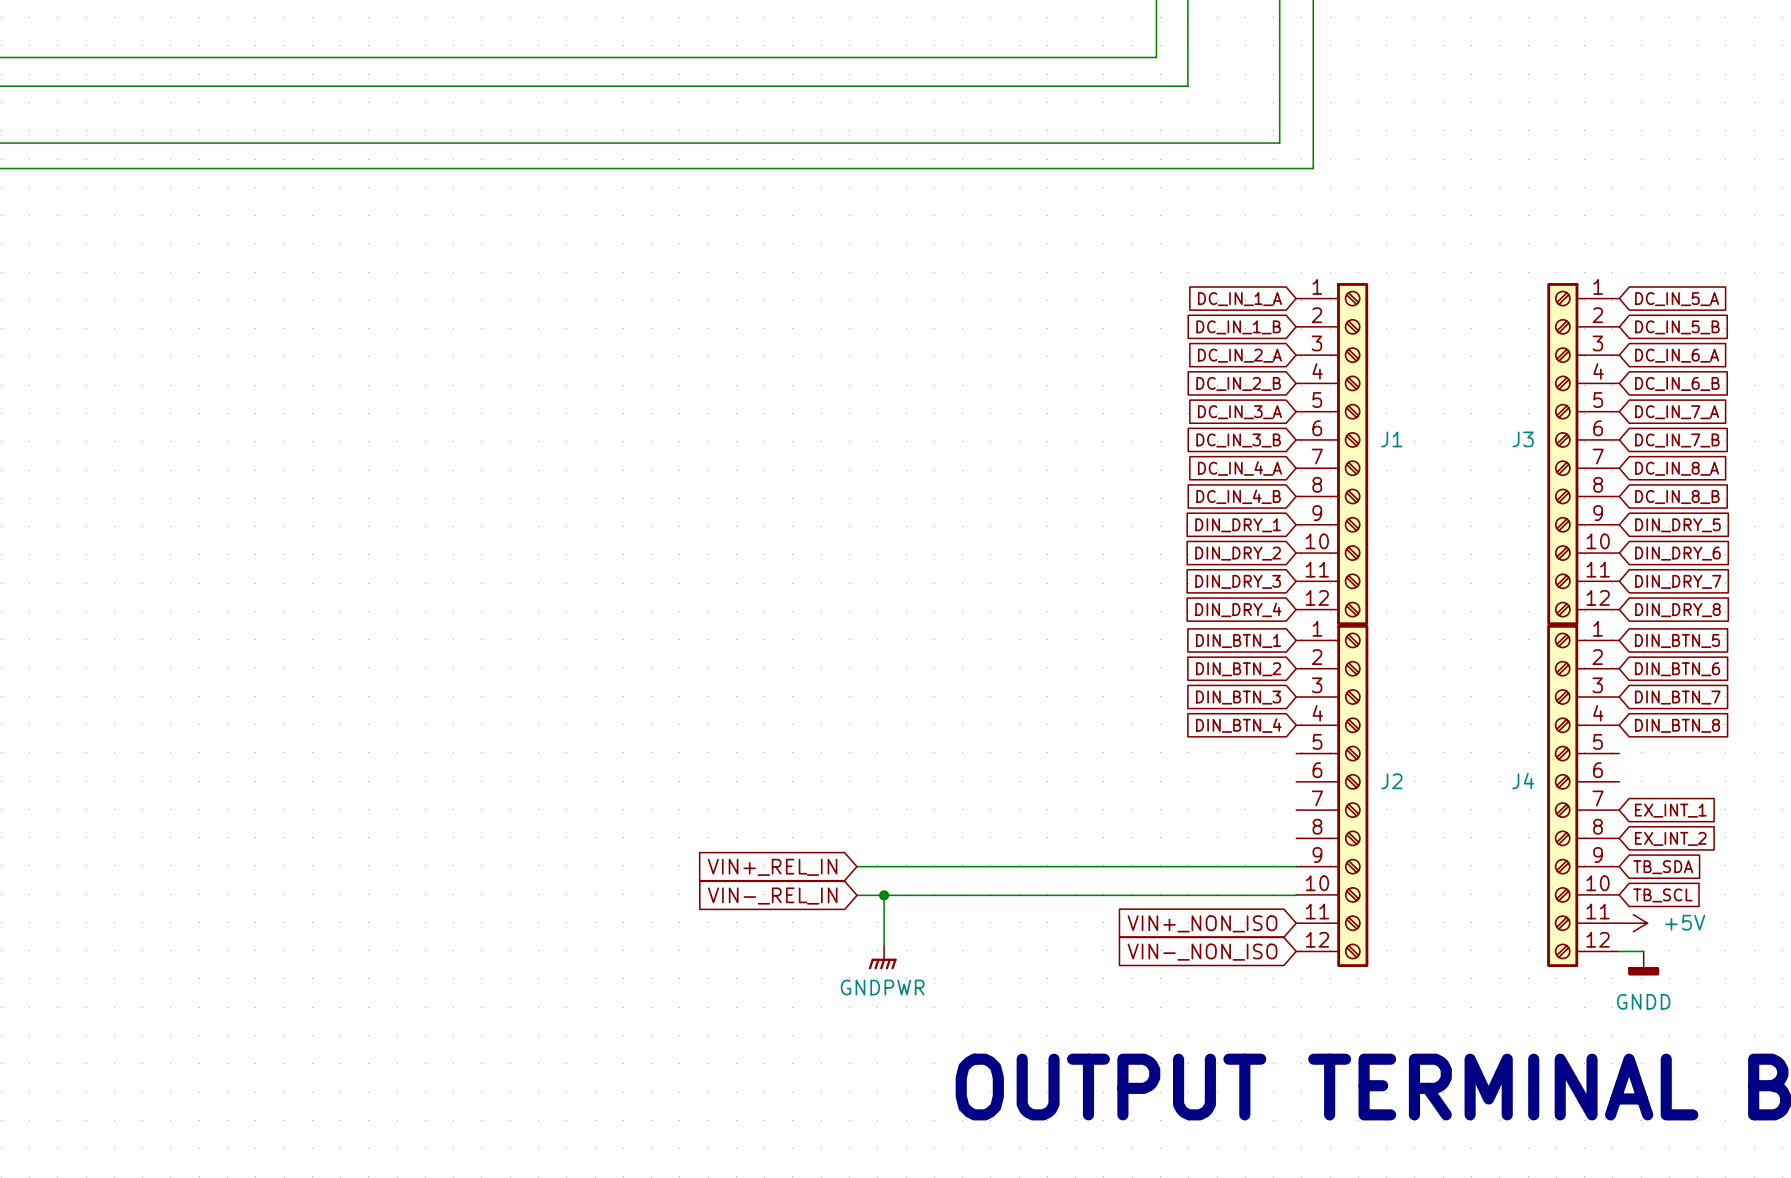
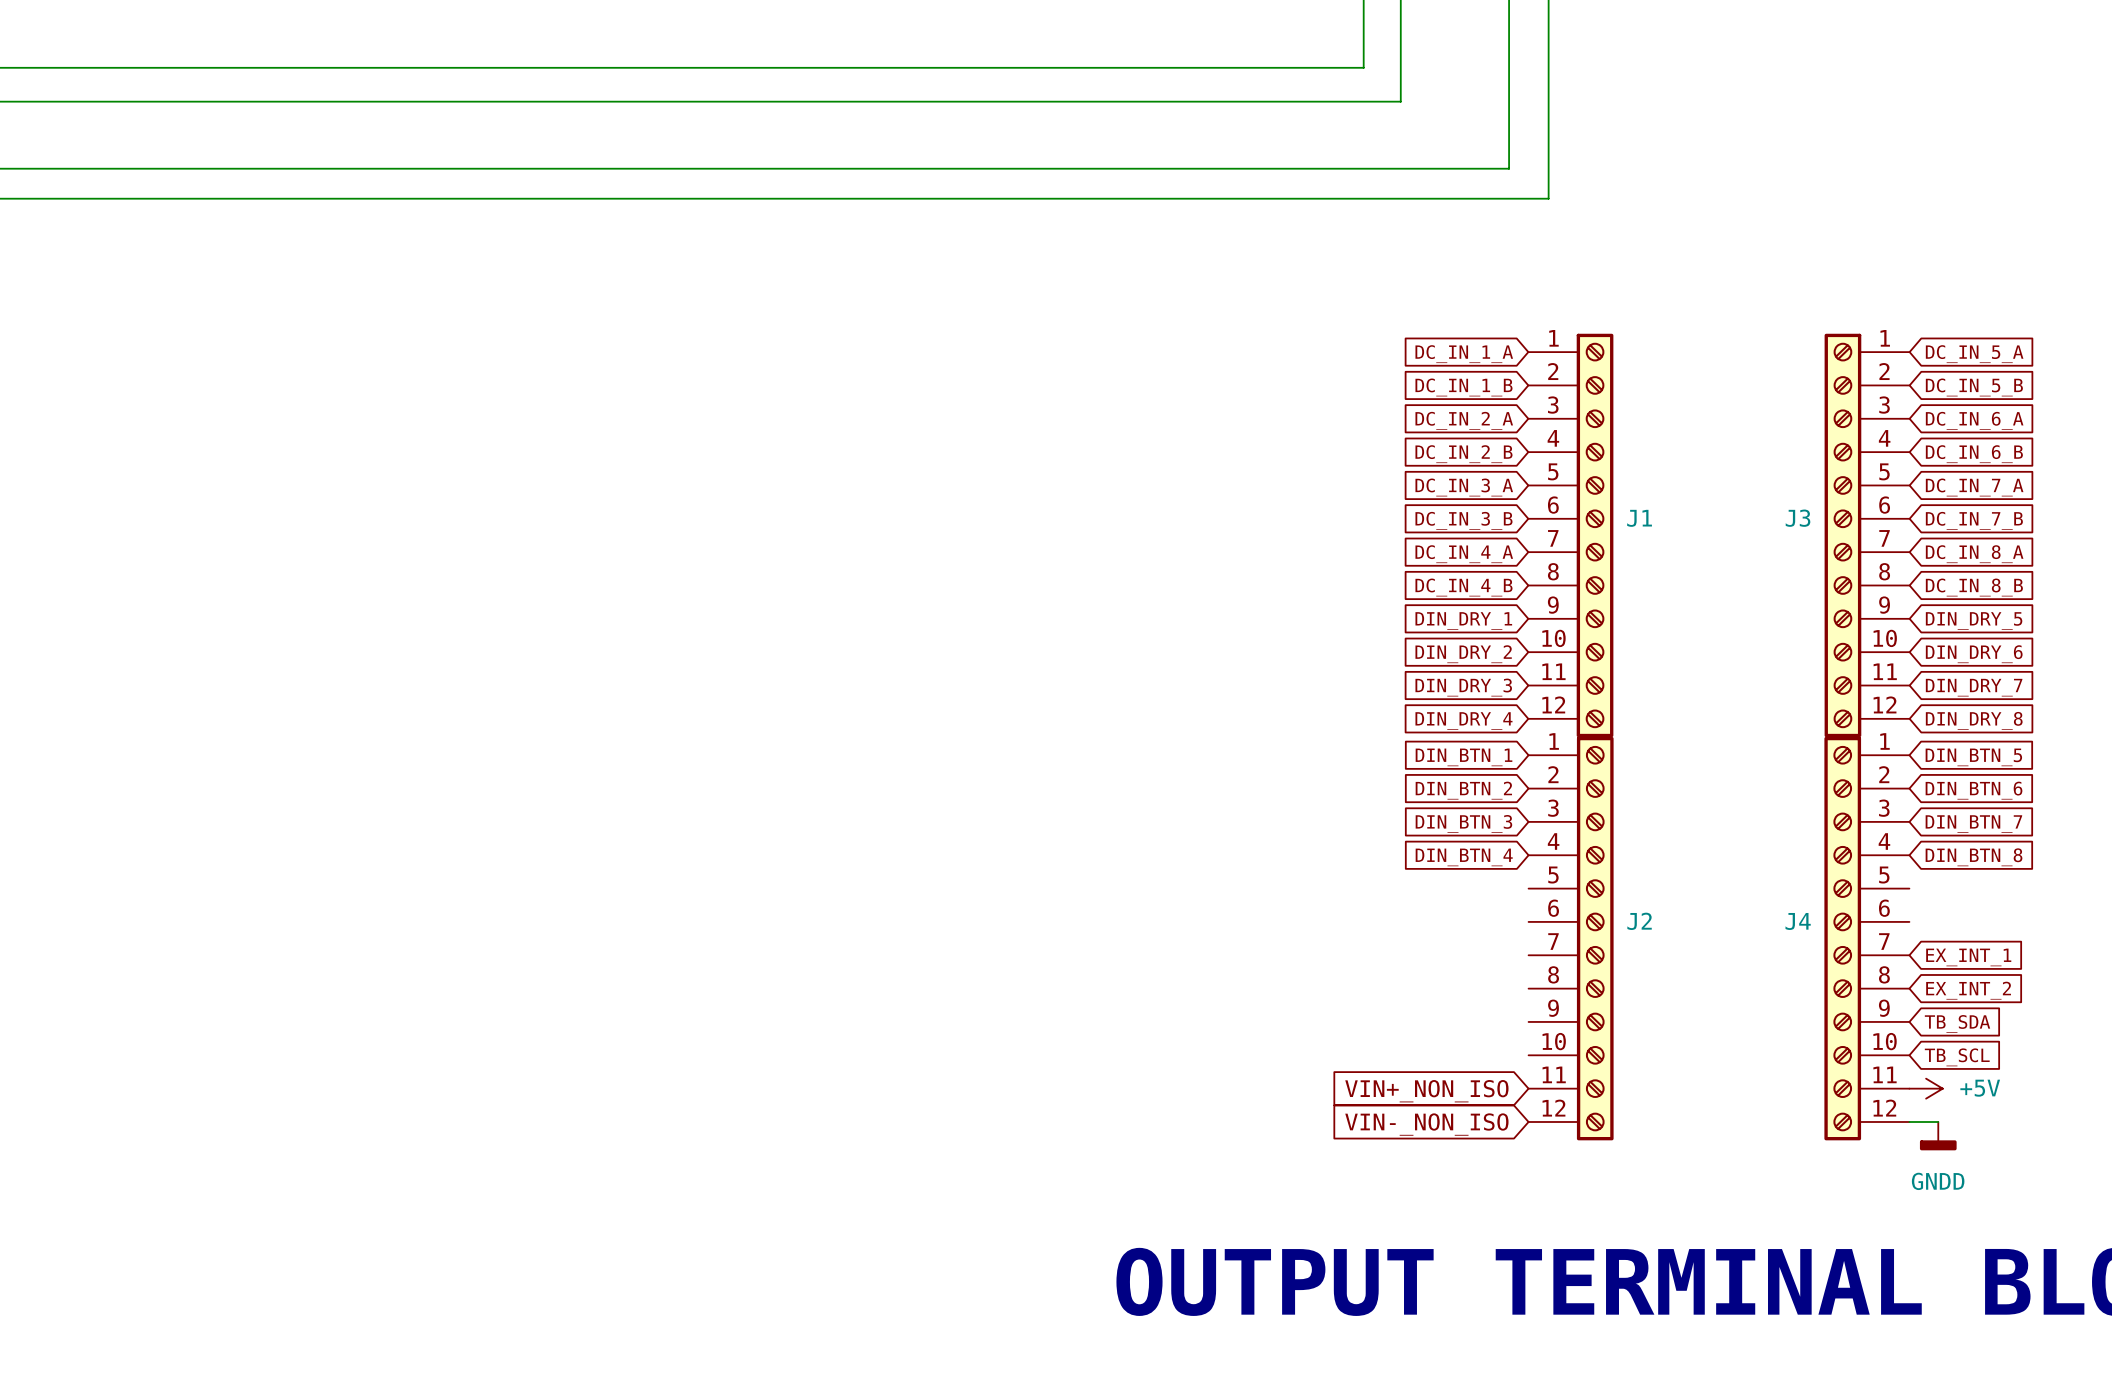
wire: (856, 866) (1296, 866) -> none
global label: VIN+_REL_IN (772, 867) -> none
wire: (1296, 894) (857, 895) -> none
wire: (884, 895) (884, 945) -> none
junction: (884, 895) -> none
global label: VIN-_REL_IN (772, 896) -> none
power symbol: GNDPWR (882, 957) -> none

